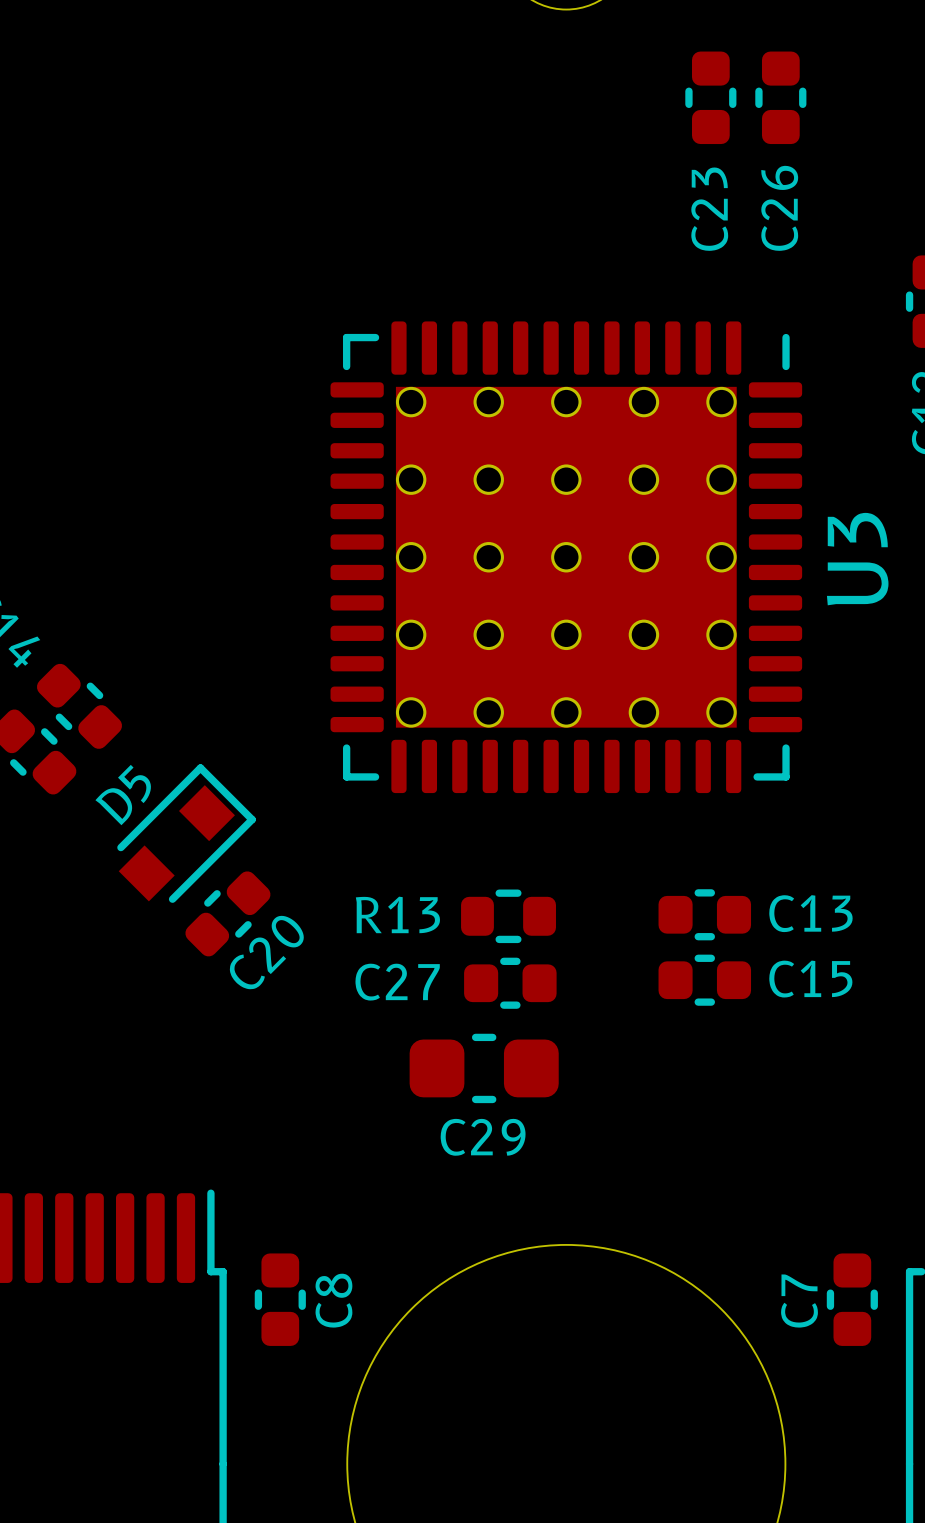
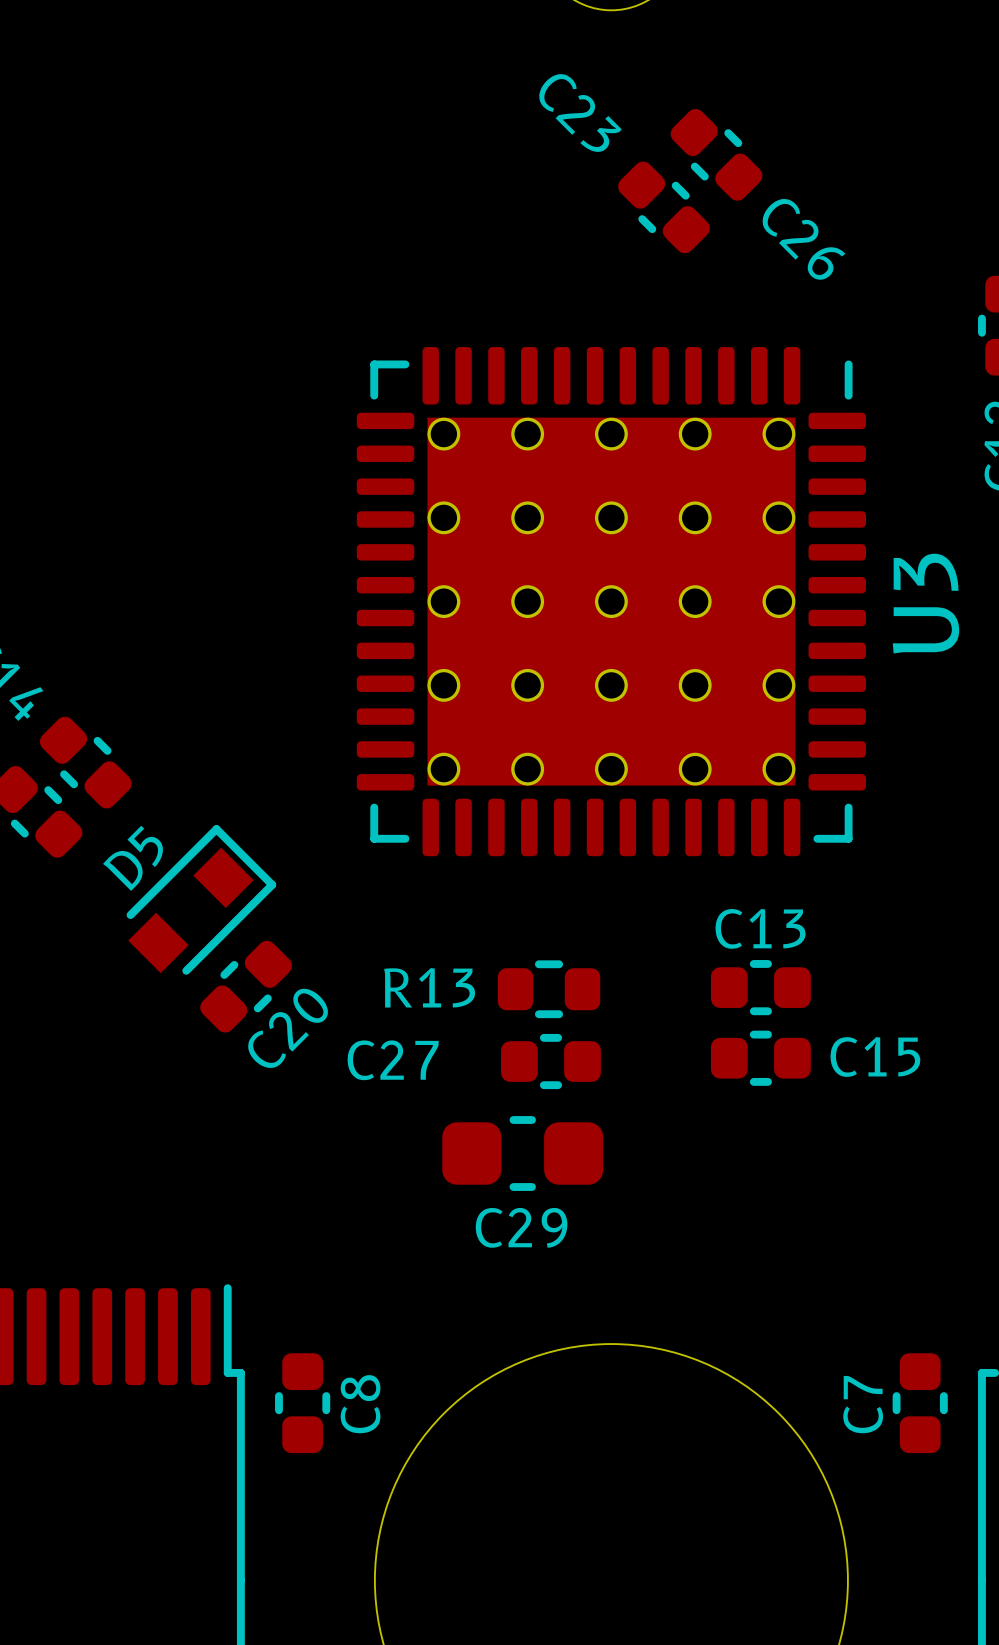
C23 rotation: 0° (710, 97) -> 45° counterclockwise (663, 207)
C23 position: (710, 97) -> (663, 207)
C26 rotation: 0° (780, 97) -> 45° counterclockwise (716, 154)
C26 position: (780, 97) -> (716, 154)
C23 name position: C23 (709, 209) -> C23 (580, 112)
C13 name position: C13 (810, 913) -> C13 (760, 928)
C27 name position: C27 (397, 982) -> C27 (393, 1060)

